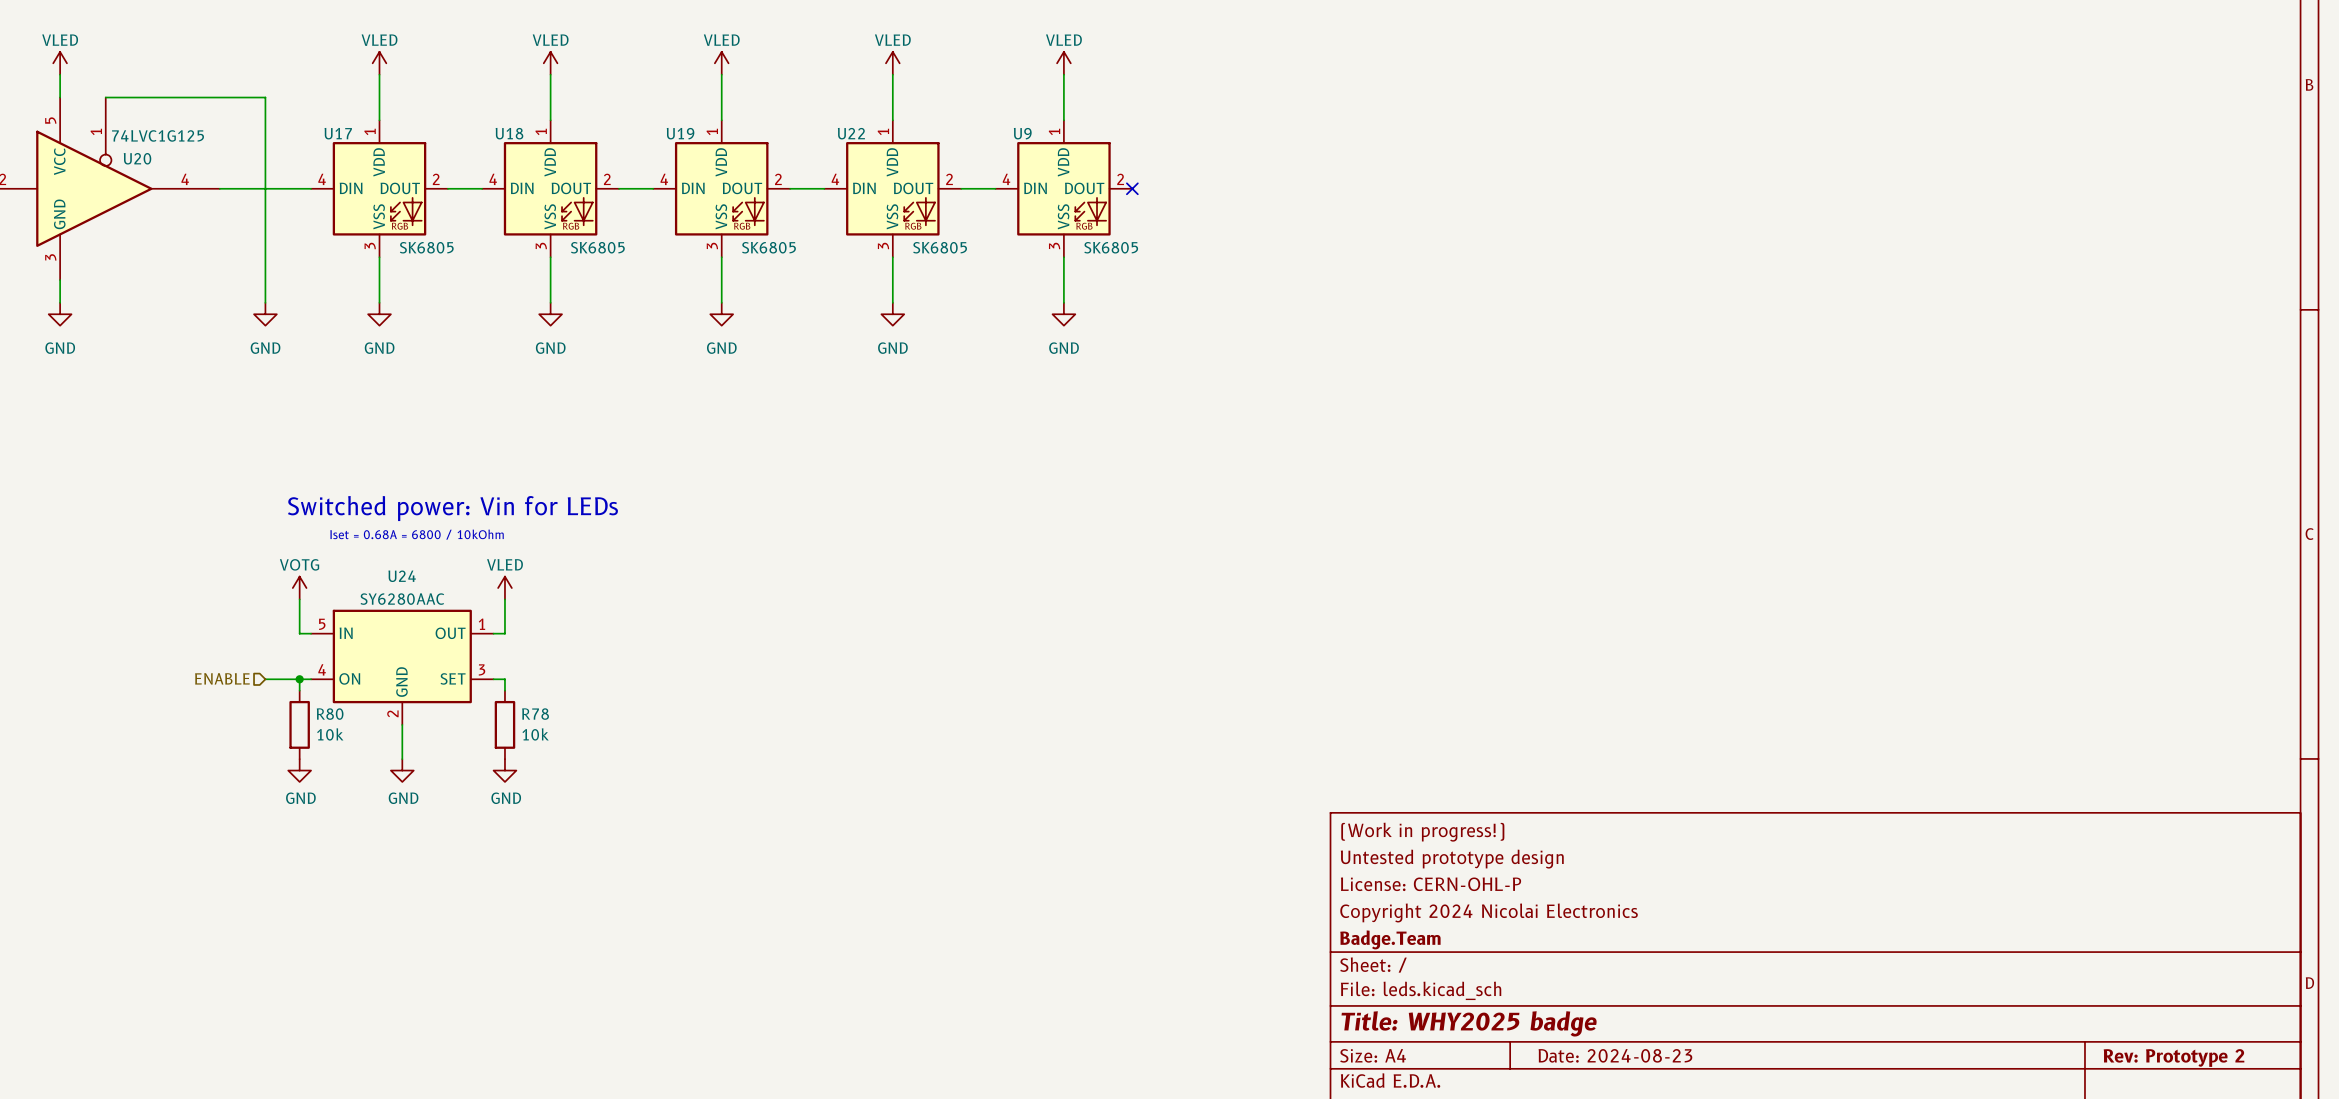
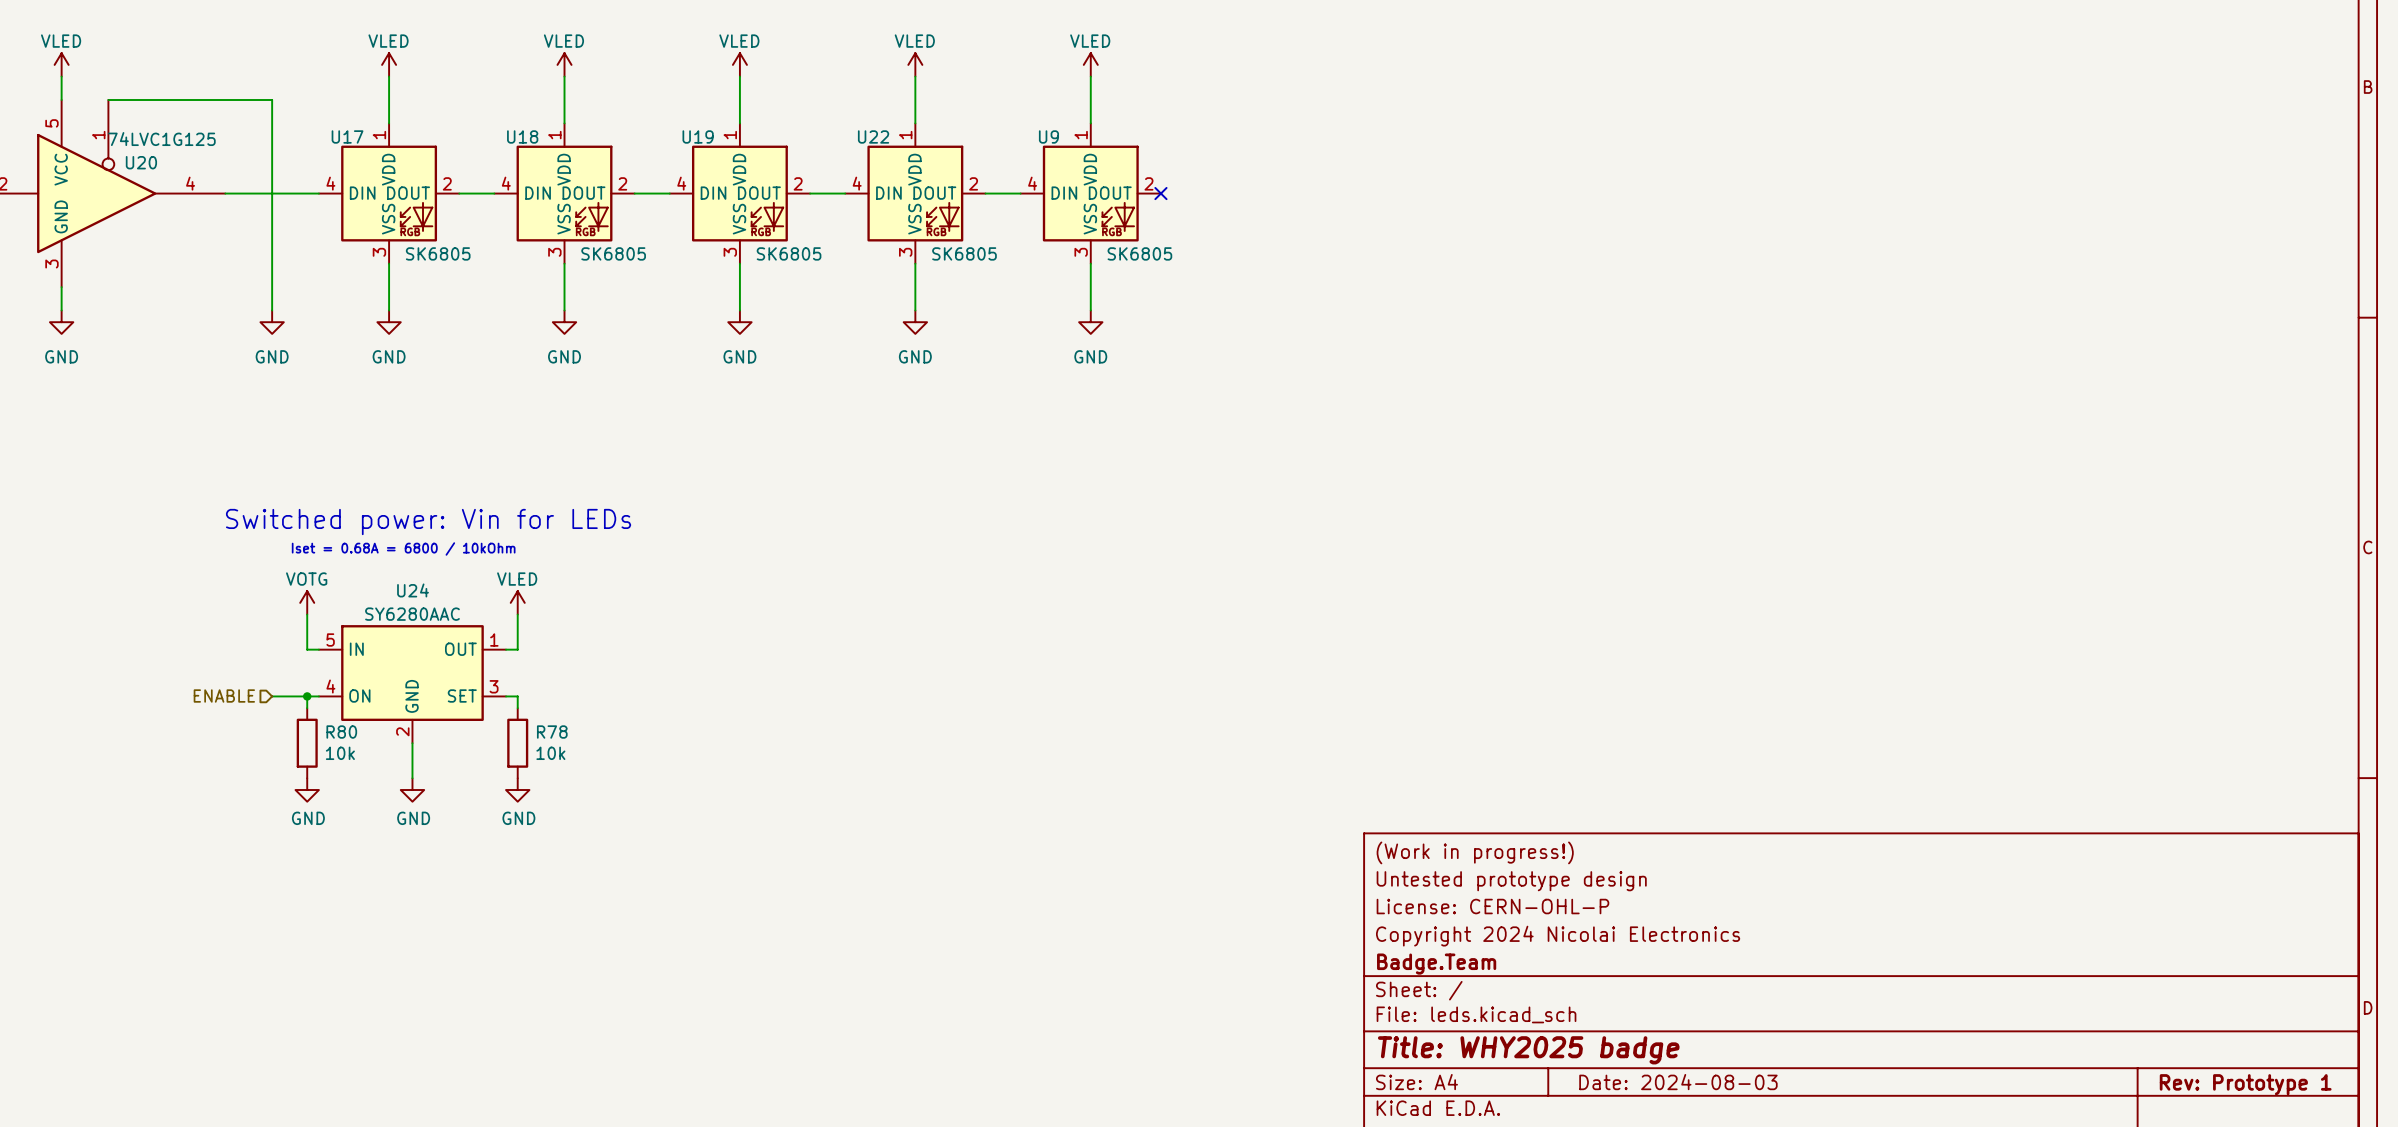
title block: Date: 2024-08-23 (1615, 1055) -> Date: 2024-08-03 (1678, 1082)
title block: Rev: Prototype 2 (2174, 1058) -> Rev: Prototype 1 (2245, 1084)

